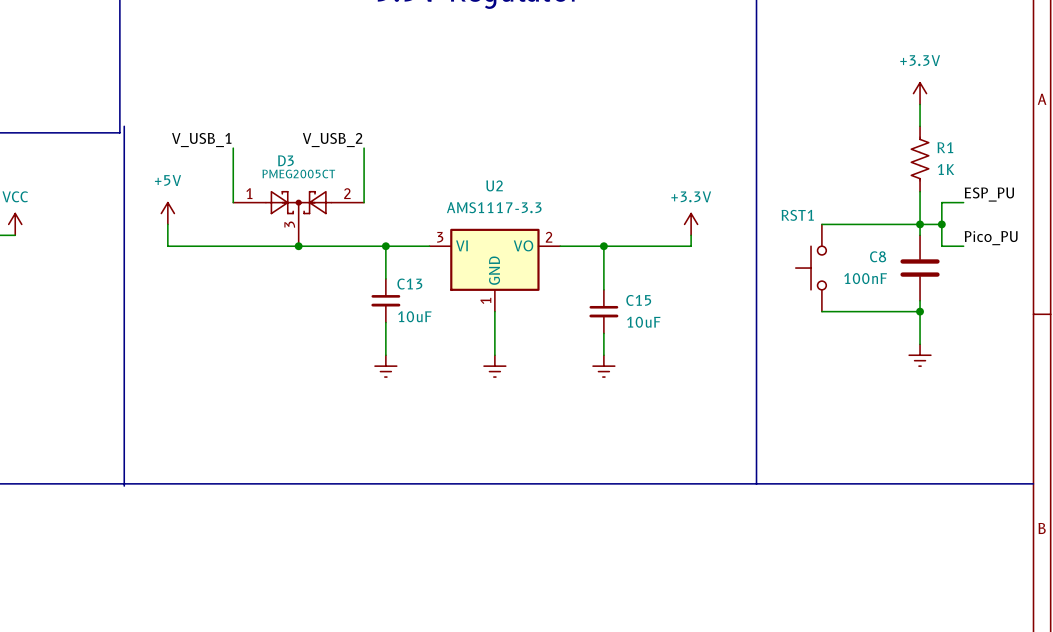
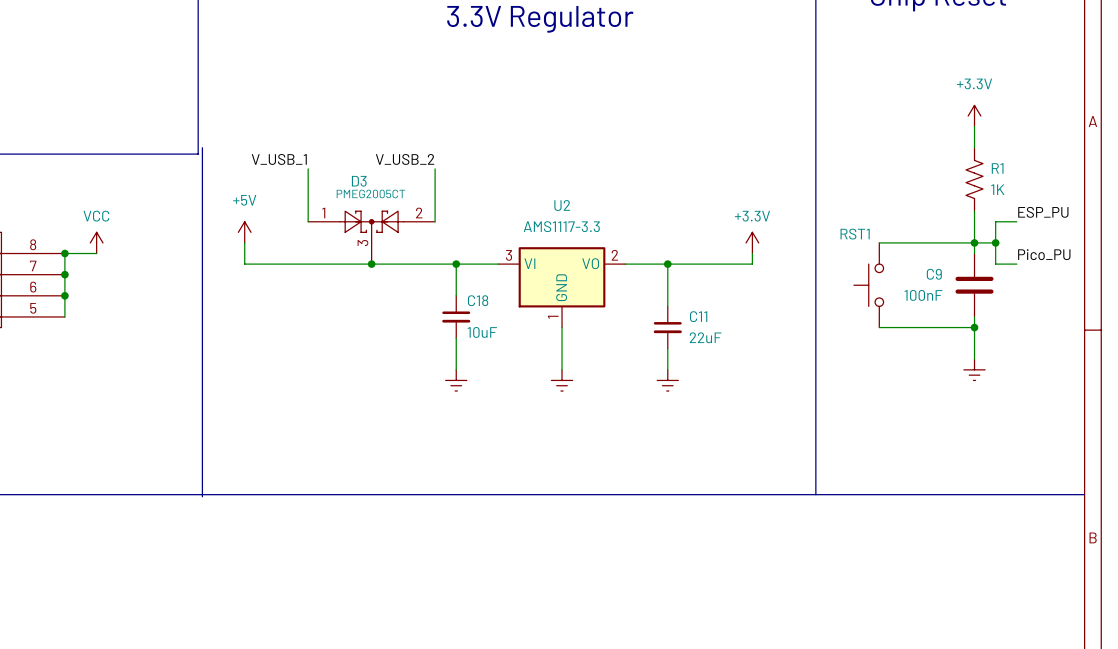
C8 name: C8 (878, 256) -> C9 (934, 274)
C13 name: C13 (409, 284) -> C18 (478, 300)
C15 name: C15 (638, 300) -> C11 (698, 316)
C15 value: 10uF (643, 322) -> 22uF (705, 337)

